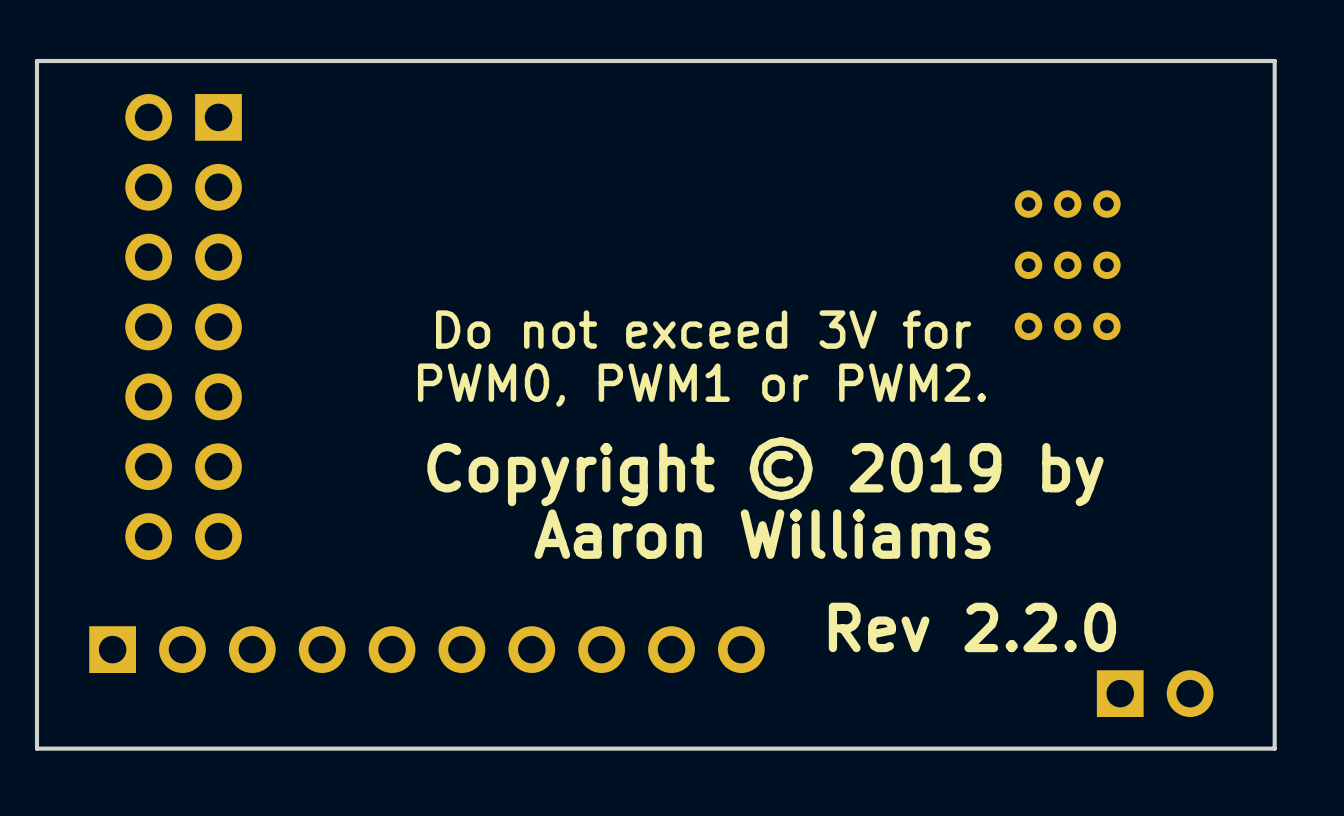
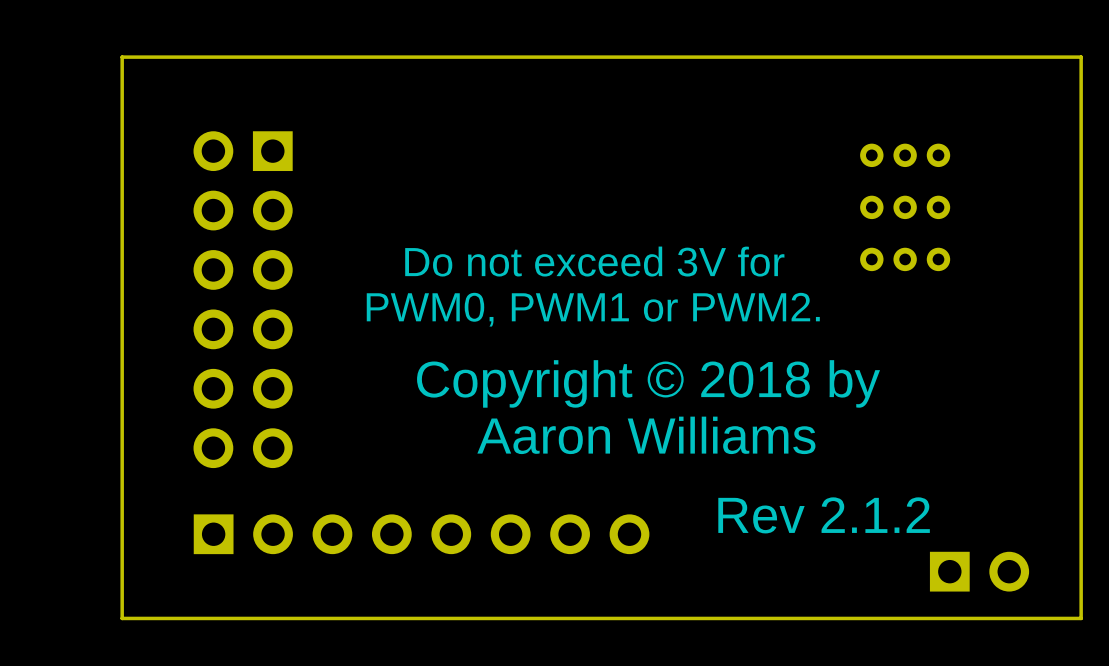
board edge: (1274, 88) (1274, 61) (36, 61) (36, 748) (146, 748) -> (1081, 57) (122, 57) (122, 618)
part: (183, 326) -> none
part: none -> (243, 299)
text: Copyright © 2019 by (765, 471) -> Copyright © 2018 by (648, 383)
text: Rev 2.2.0 (972, 627) -> Rev 2.1.2 (824, 515)
part: (426, 649) -> none
part: none -> (421, 534)

